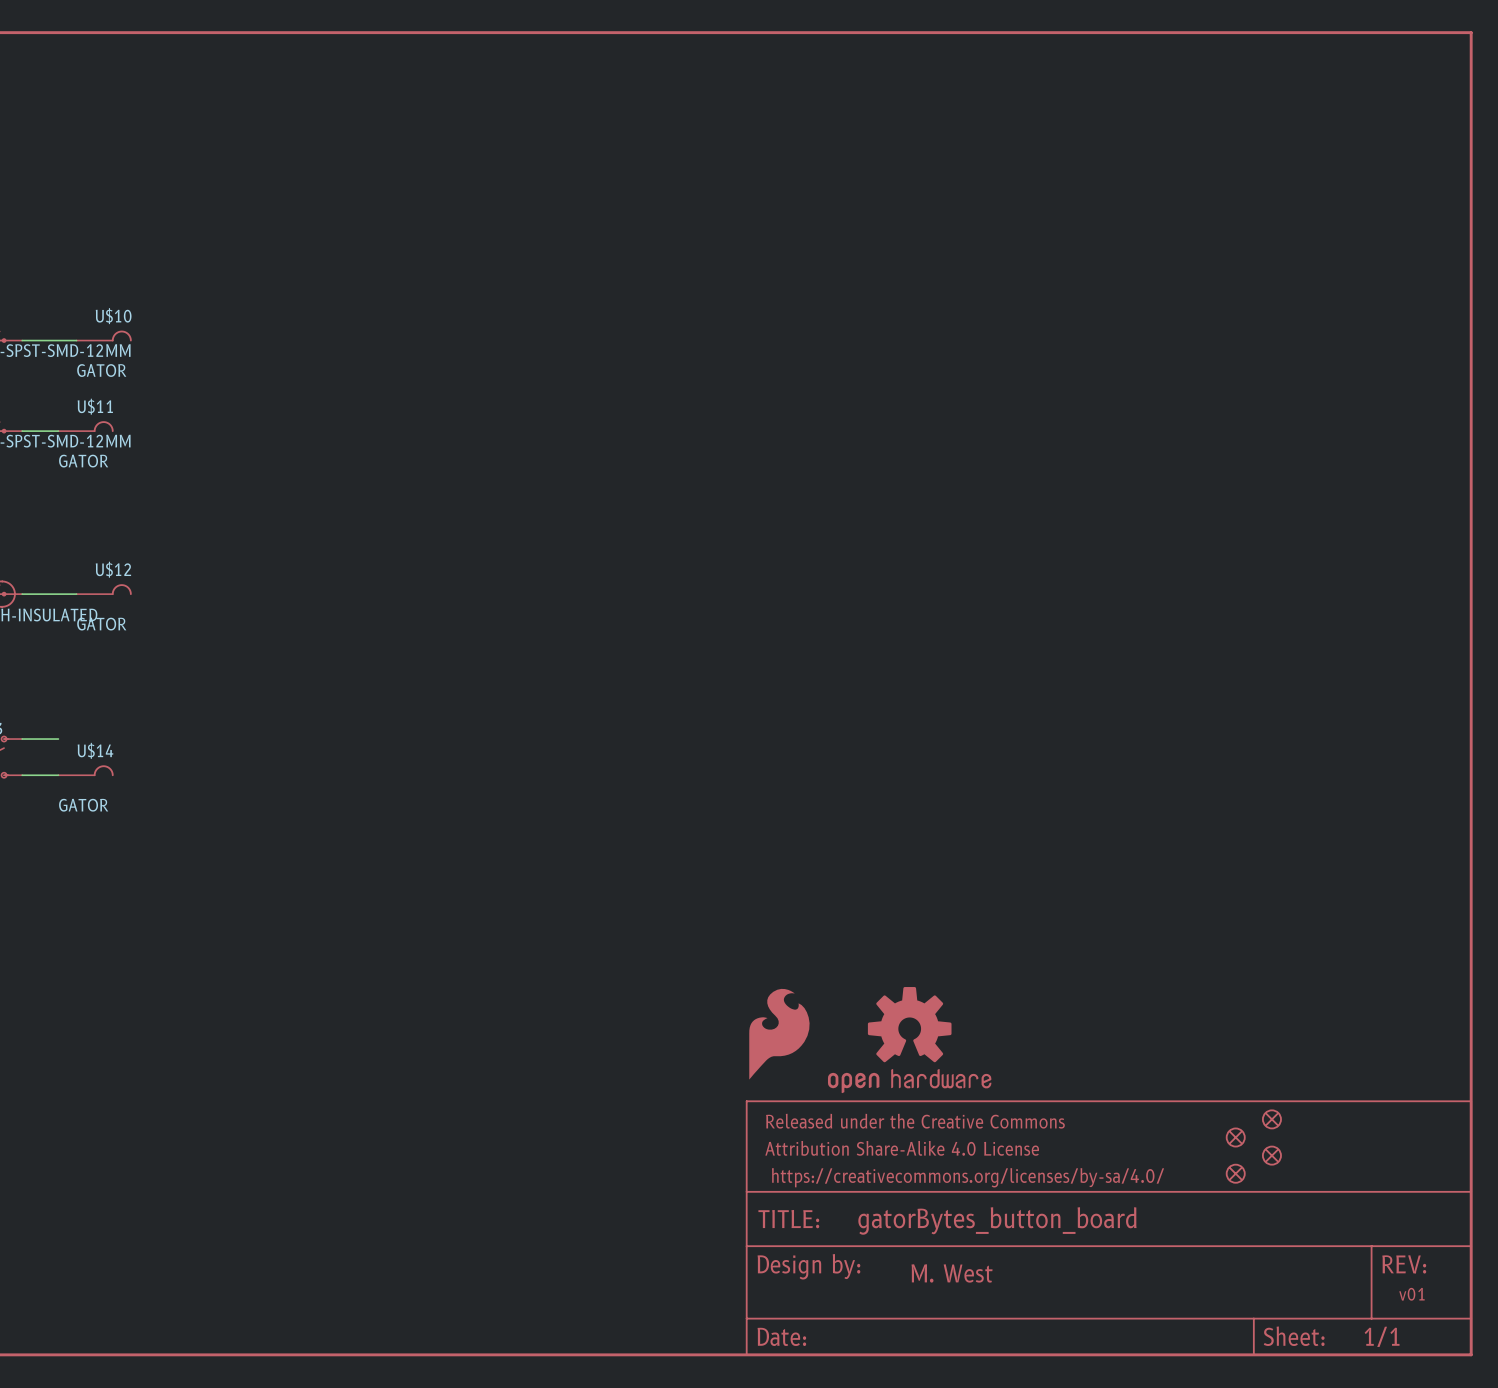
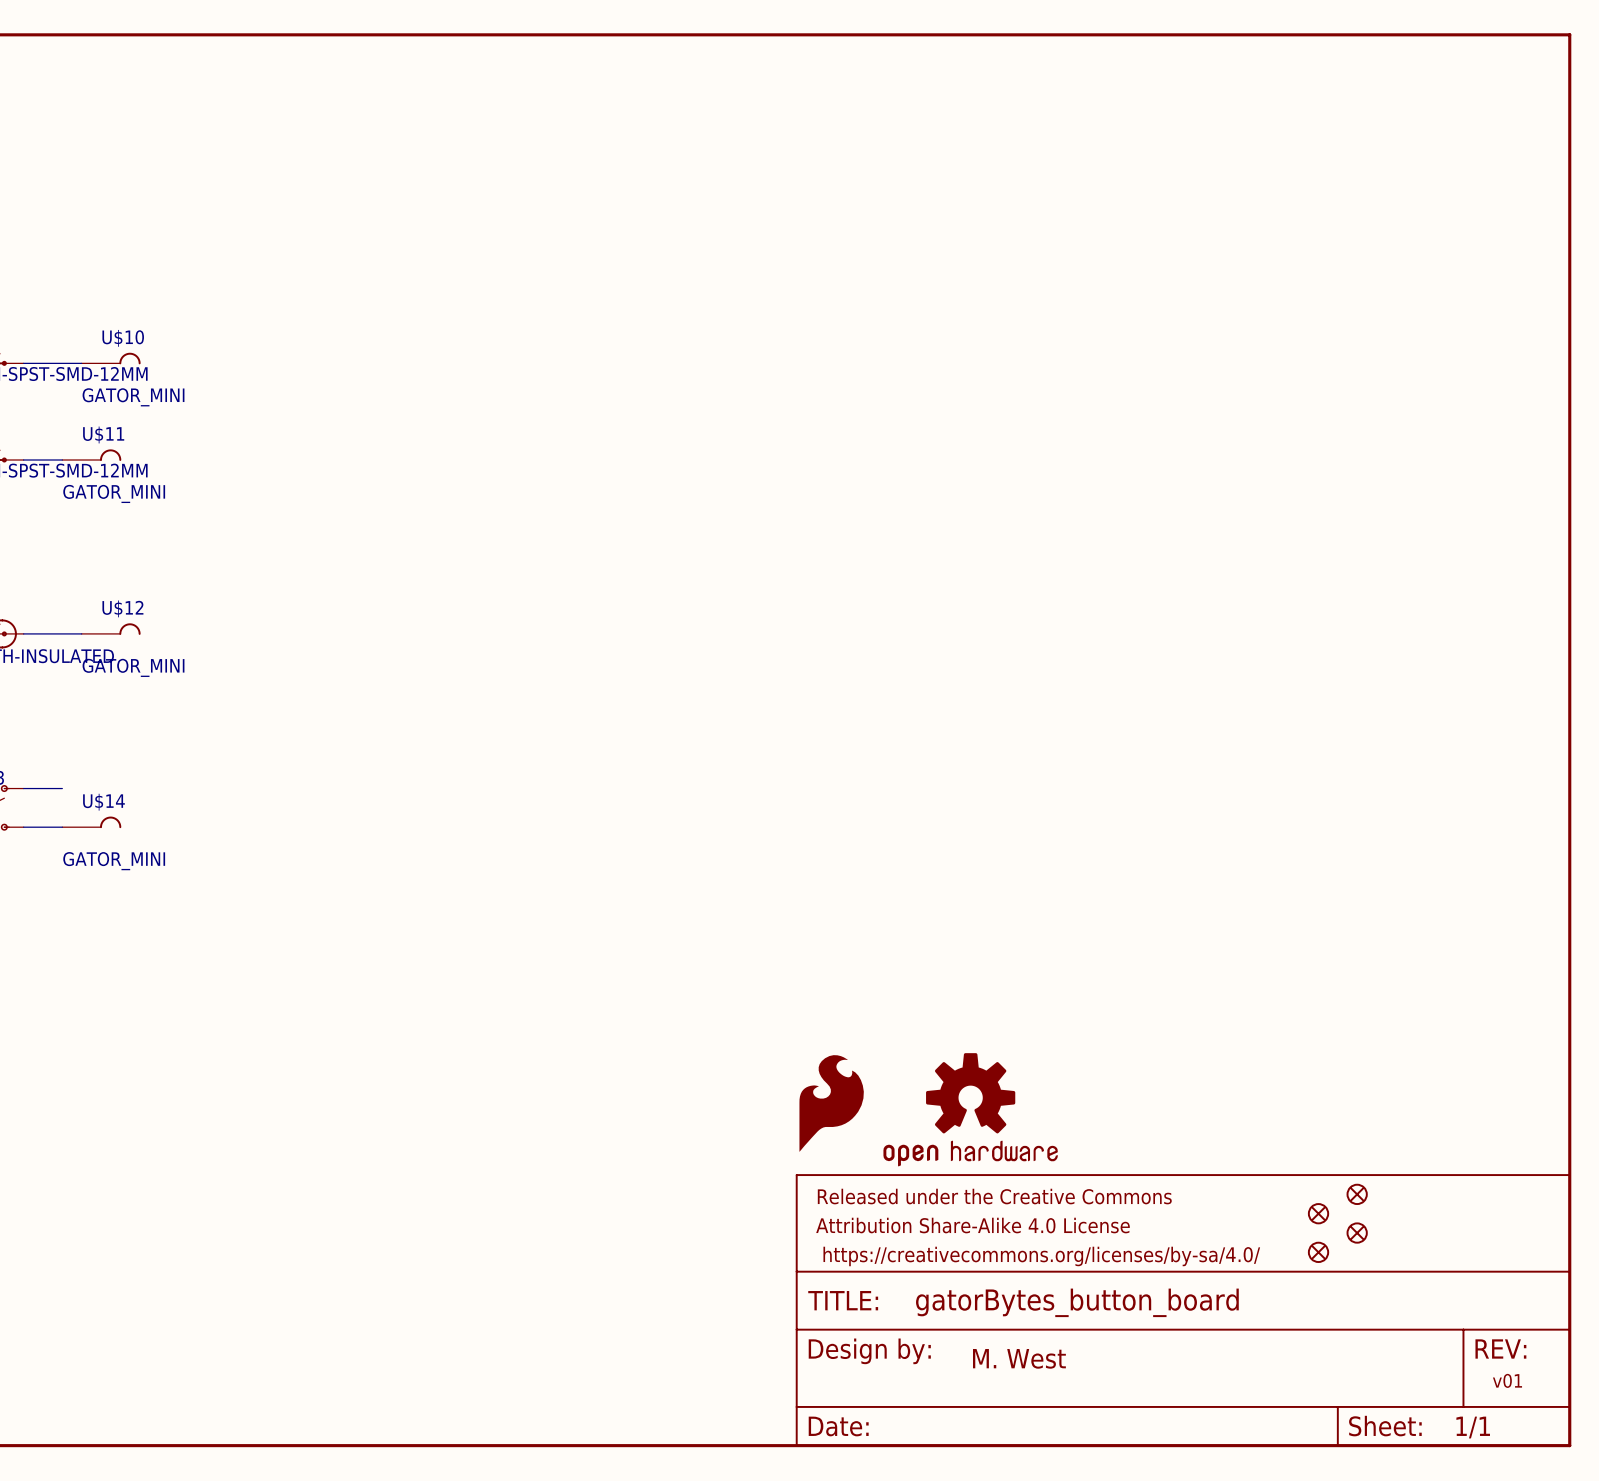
U$10 value: GATOR (101, 370) -> GATOR_MINI (133, 397)
U$11 value: GATOR (83, 461) -> GATOR_MINI (114, 493)
U$12 value: GATOR (101, 624) -> GATOR_MINI (133, 667)
U$14 value: GATOR (83, 805) -> GATOR_MINI (114, 861)

